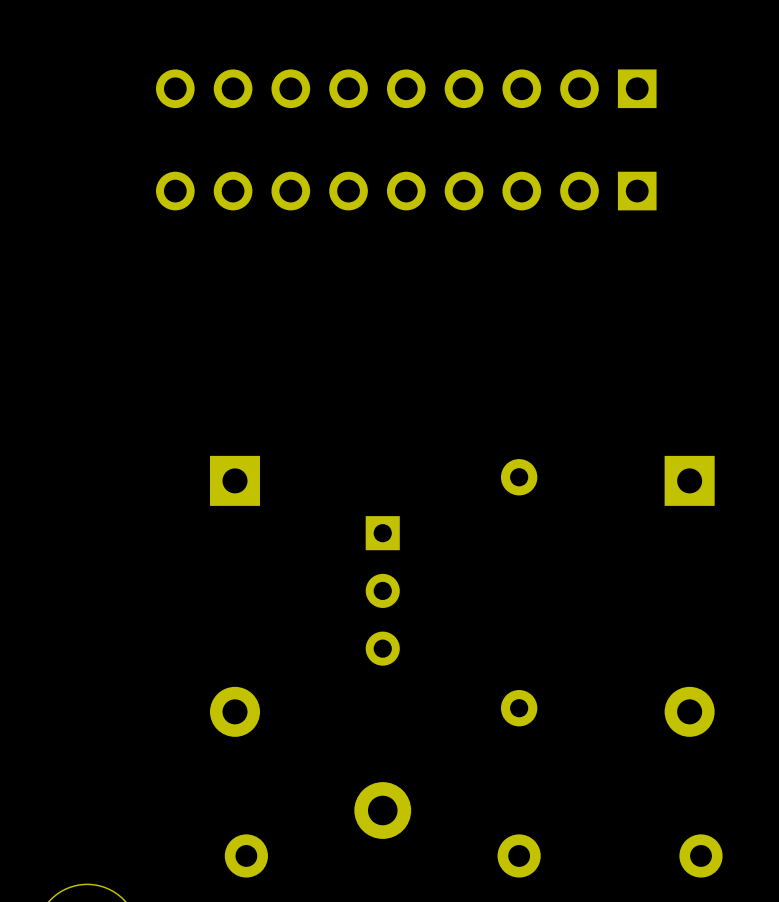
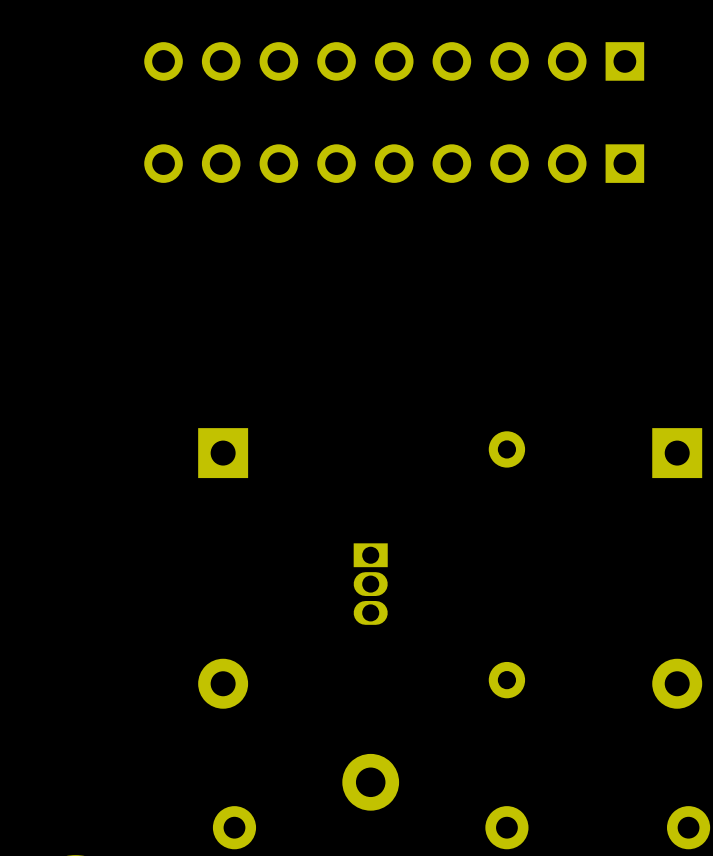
part footprint: [365, 516, 400, 666] -> [353, 543, 388, 625]

